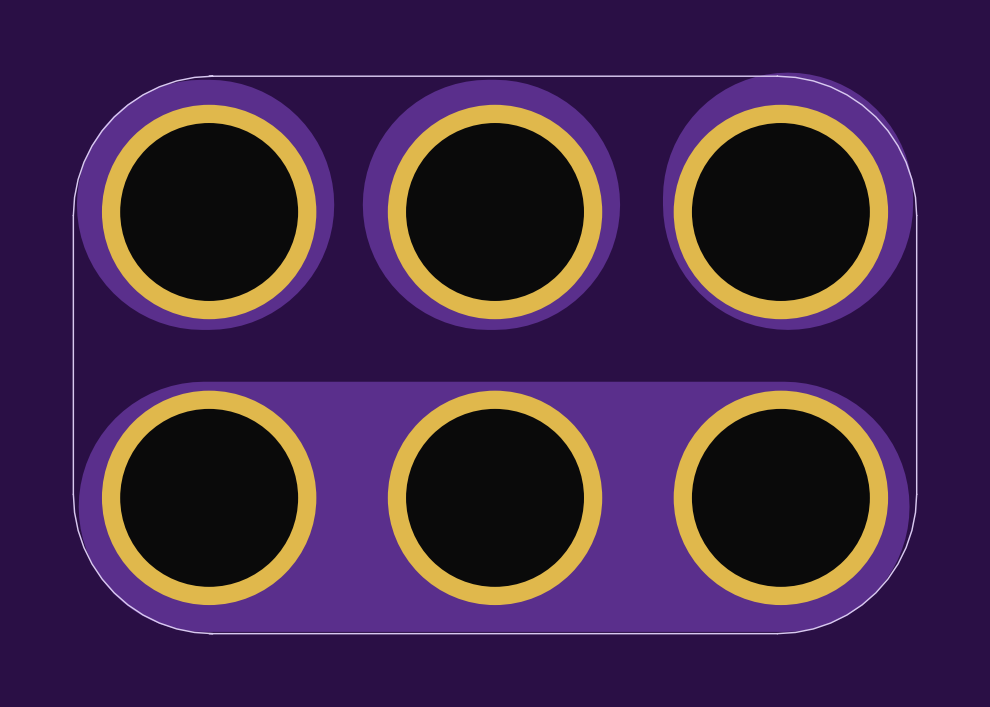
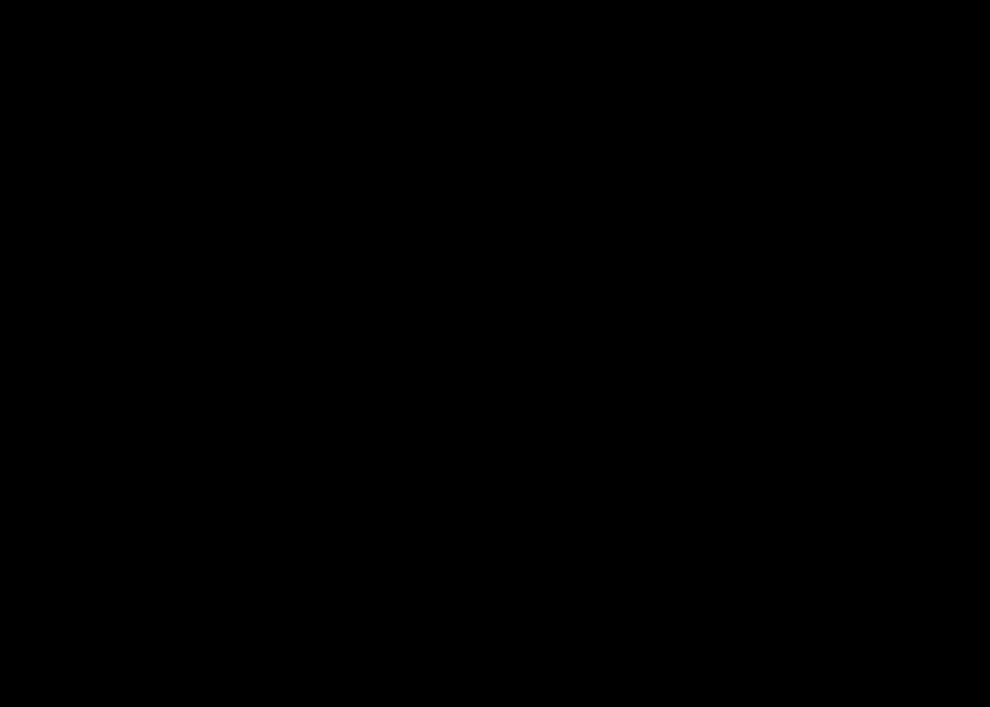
part: (495, 353) -> none

